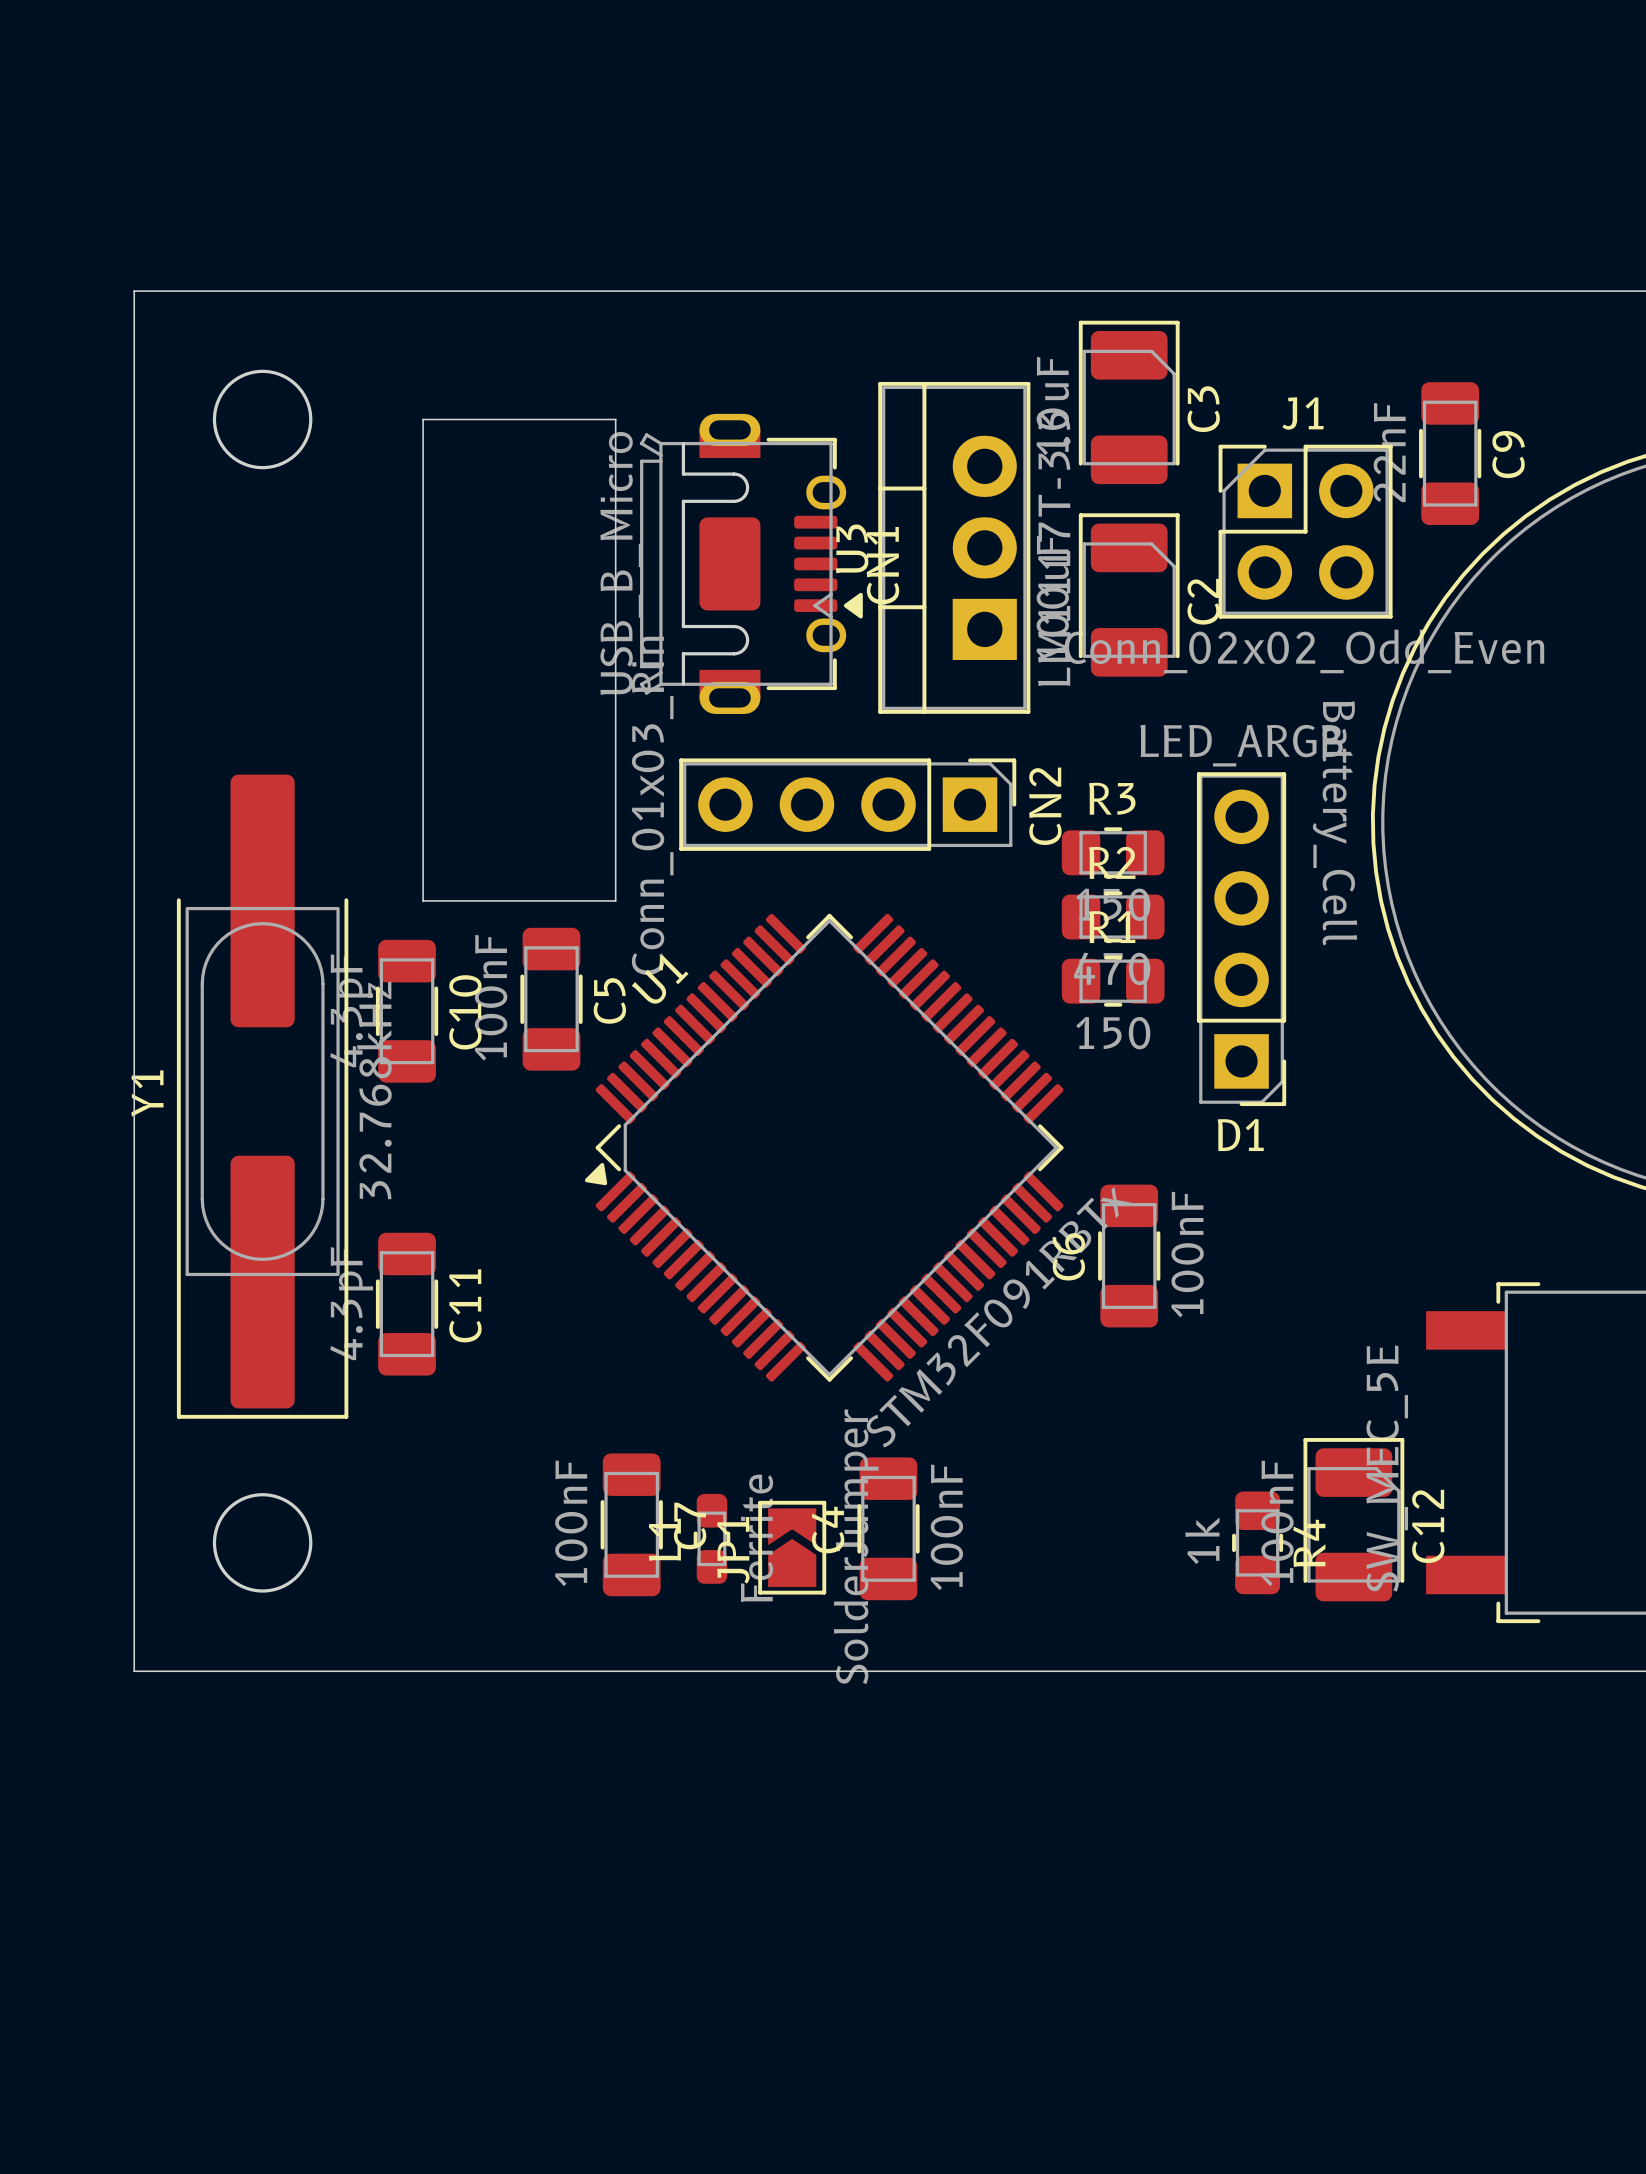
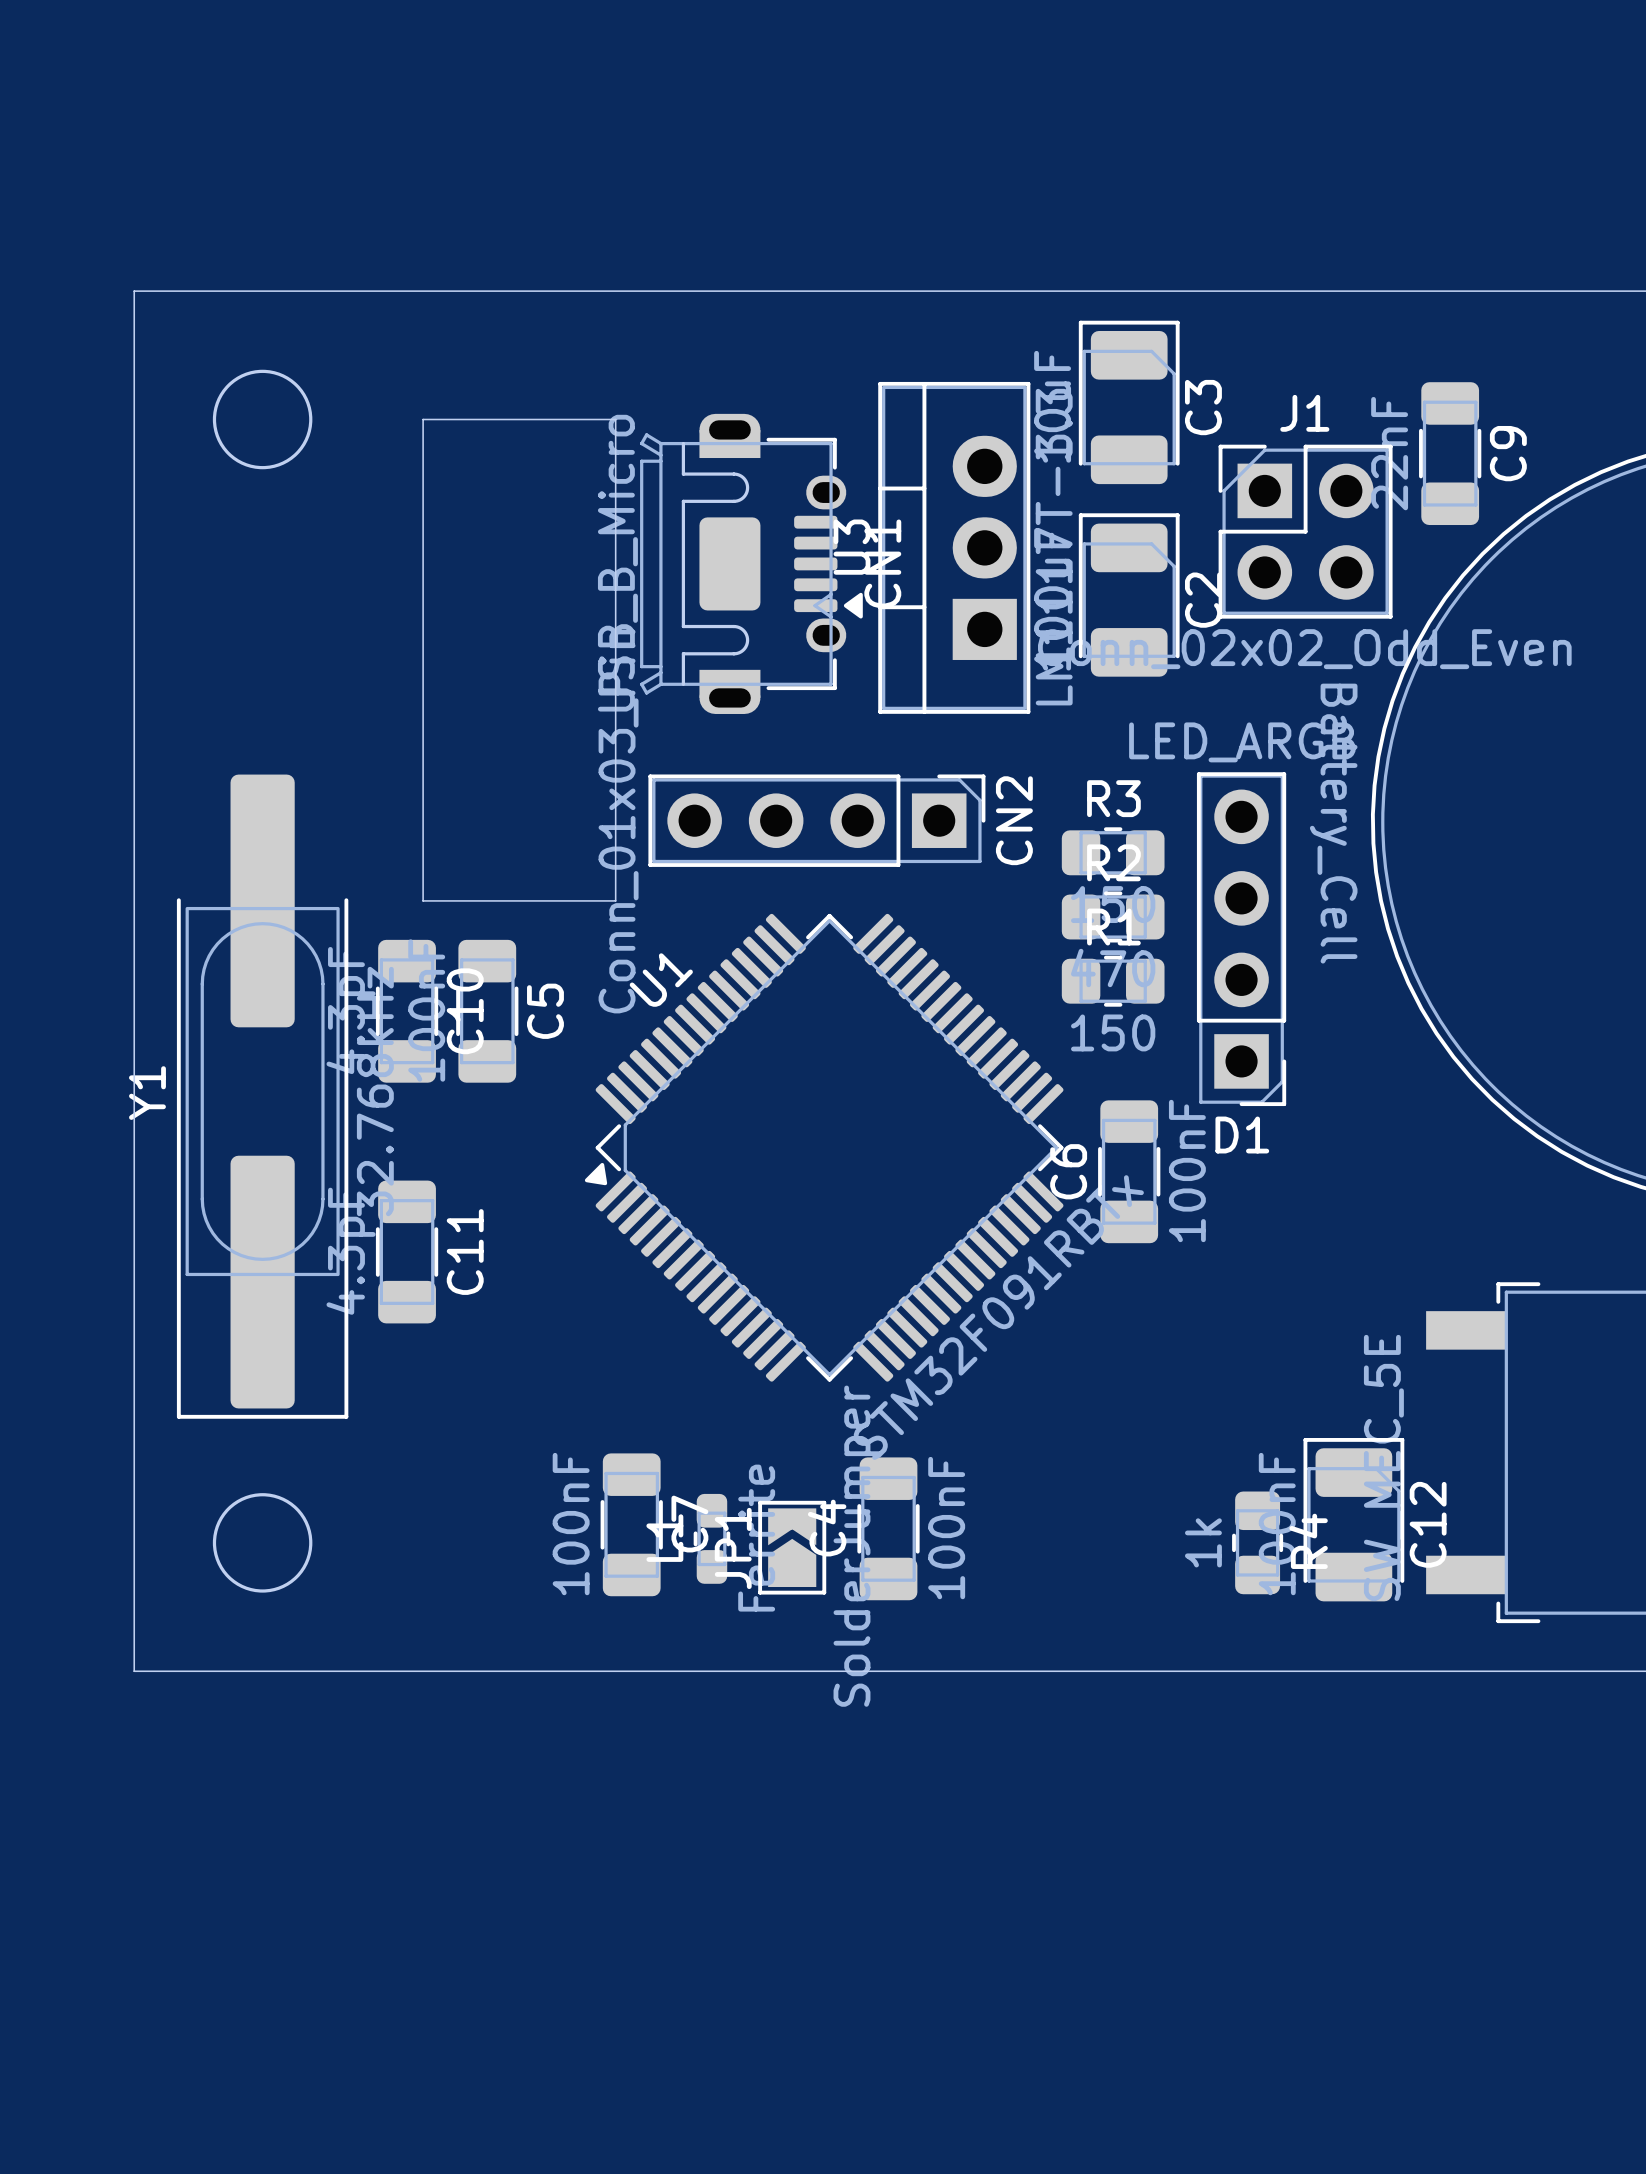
CN2 position: (847, 804) -> (816, 820)
C5 position: (551, 999) -> (487, 1011)
C6 position: (1129, 1256) -> (1129, 1171)
C11 position: (407, 1304) -> (407, 1252)

